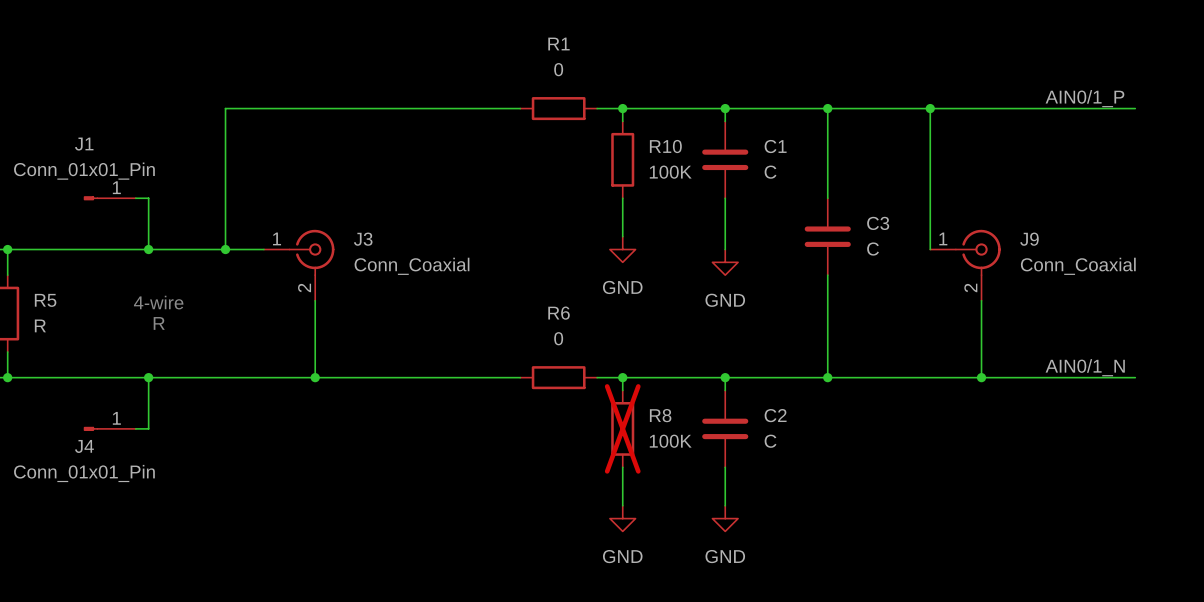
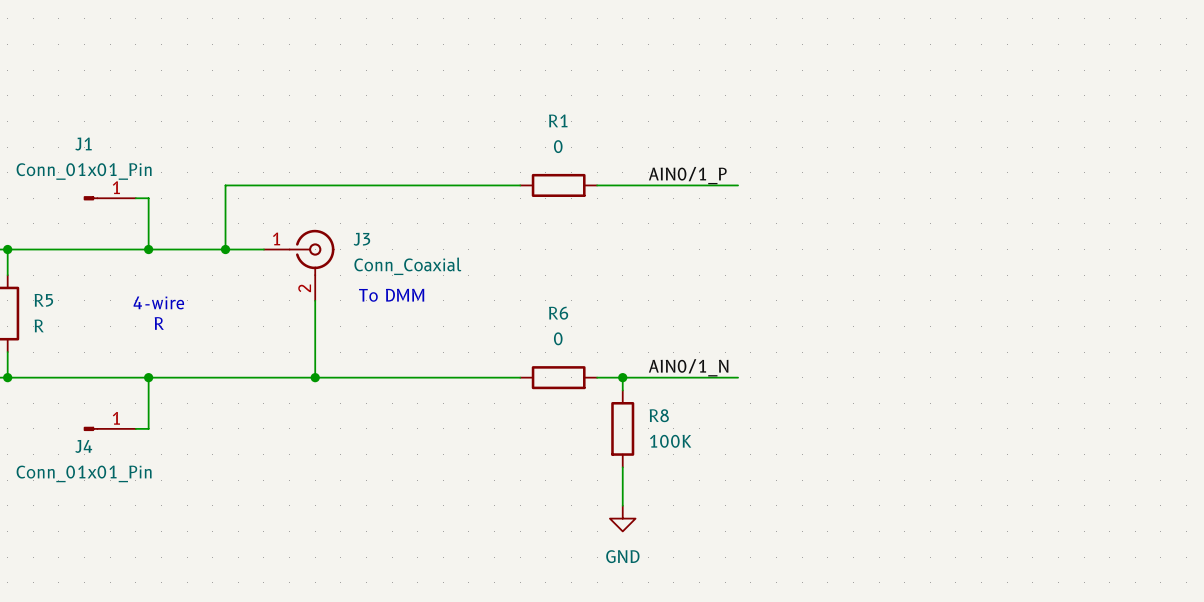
label: AIN0/1_P (1084, 98) -> none
wire: (520, 108) (225, 108) (225, 185) -> (520, 185) (225, 185)
R1 position: (558, 108) -> (558, 185)
wire: (597, 108) (1135, 108) -> none
wire: (622, 108) (622, 121) -> none
junction: (622, 108) -> none
wire: (725, 108) (725, 121) -> none
junction: (725, 108) -> none
wire: (827, 108) (827, 198) -> none
junction: (827, 108) -> none
wire: (930, 108) (930, 249) -> none
junction: (930, 108) -> none
R10: 100K (622, 159) -> none
C1: C (725, 159) -> none
label: none -> AIN0/1_P (687, 175)
wire: none -> (597, 185) (738, 185)
wire: (622, 198) (622, 236) -> none
wire: (725, 198) (725, 249) -> none
C3: C (827, 236) -> none
power symbol: GND (622, 249) -> none
power symbol: GND (725, 262) -> none
J9: Conn_Coaxial (965, 265) -> none
wire: (827, 275) (827, 377) -> none
text: none -> To DMM (391, 295)
wire: (981, 300) (981, 377) -> none
label: none -> AIN0/1_N (688, 367)
label: AIN0/1_N (1085, 367) -> none
wire: (725, 377) (725, 390) -> none
junction: (725, 377) -> none
wire: (738, 377) (1135, 377) -> none
junction: (827, 377) -> none
junction: (981, 377) -> none
R8 do-not-place cross: (622, 428) -> none
C2: C (725, 428) -> none
wire: (725, 467) (725, 505) -> none
power symbol: GND (725, 518) -> none

